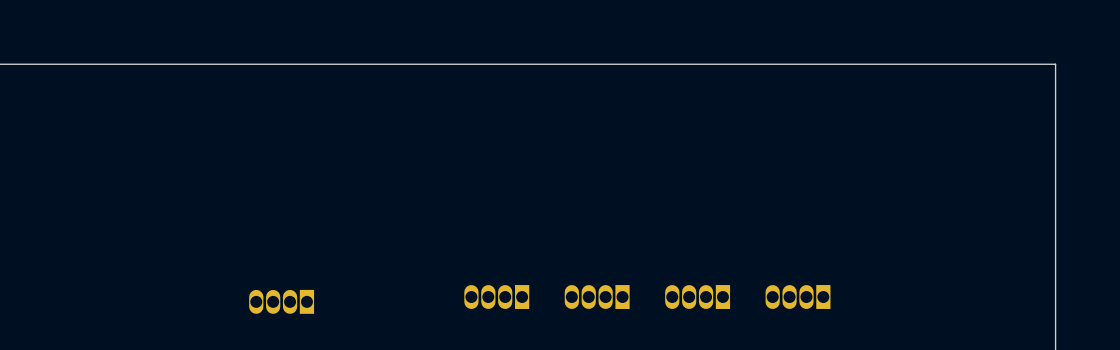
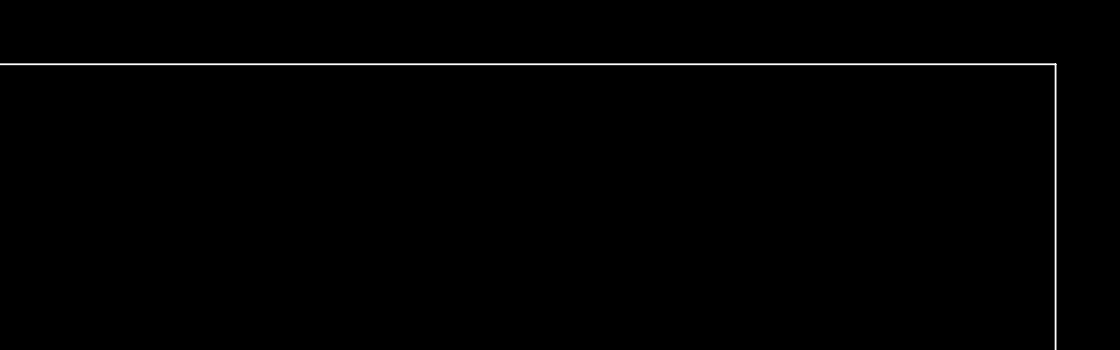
part: (496, 297) -> none
part: (597, 297) -> none
part: (697, 297) -> none
part: (798, 297) -> none
part: (281, 301) -> none

